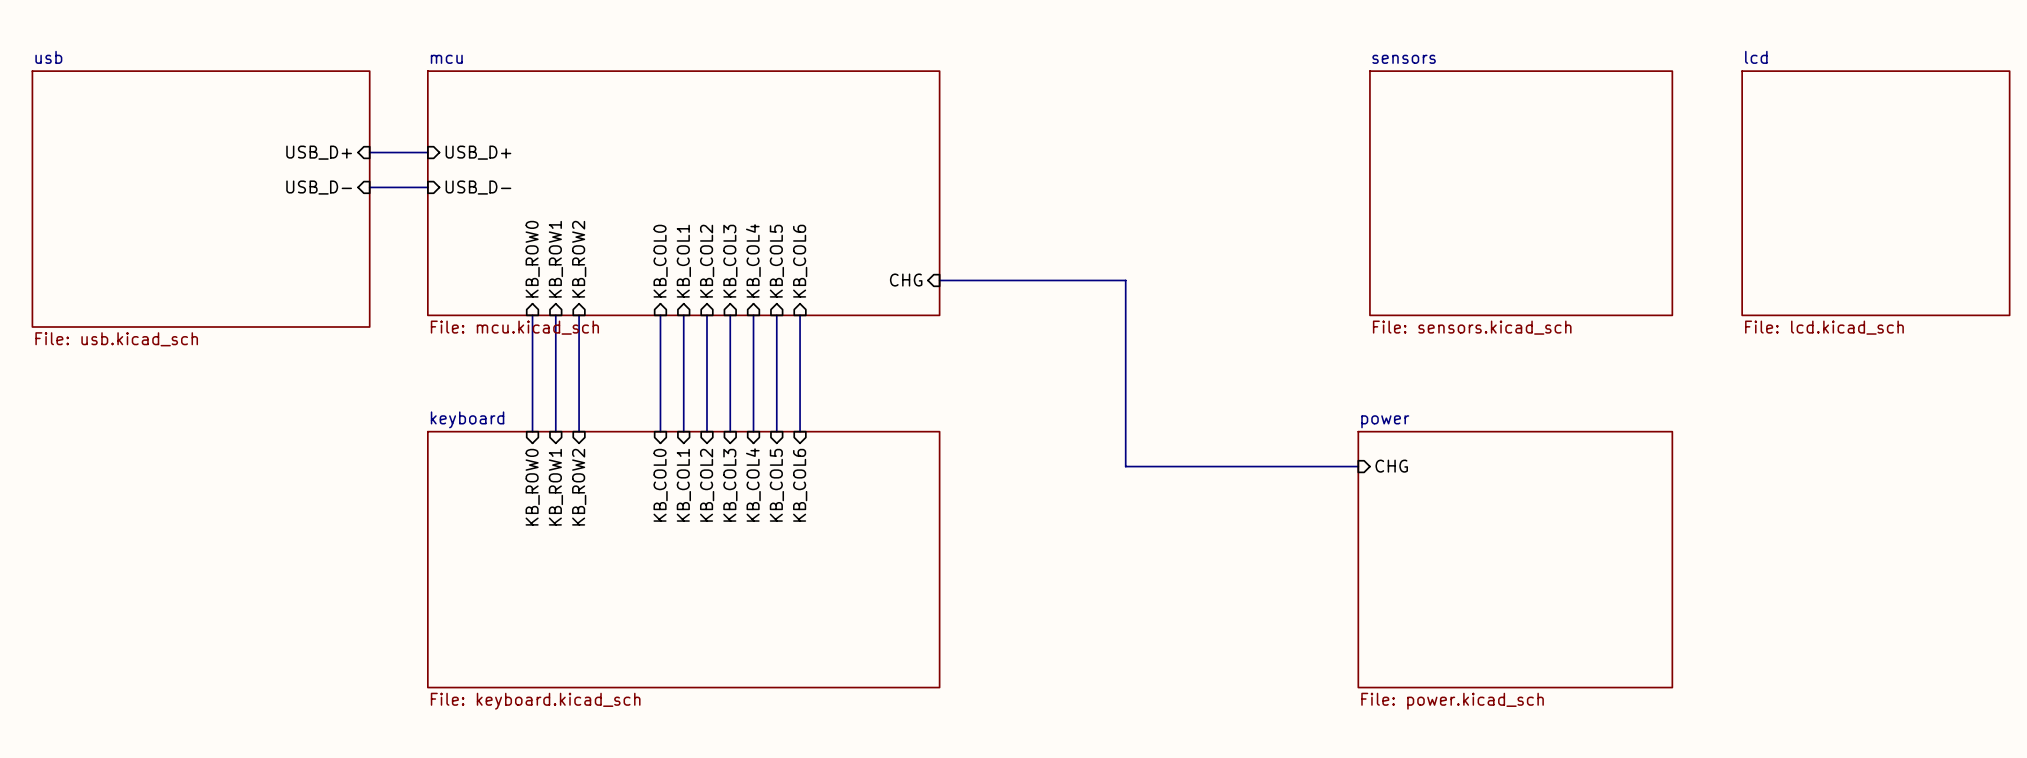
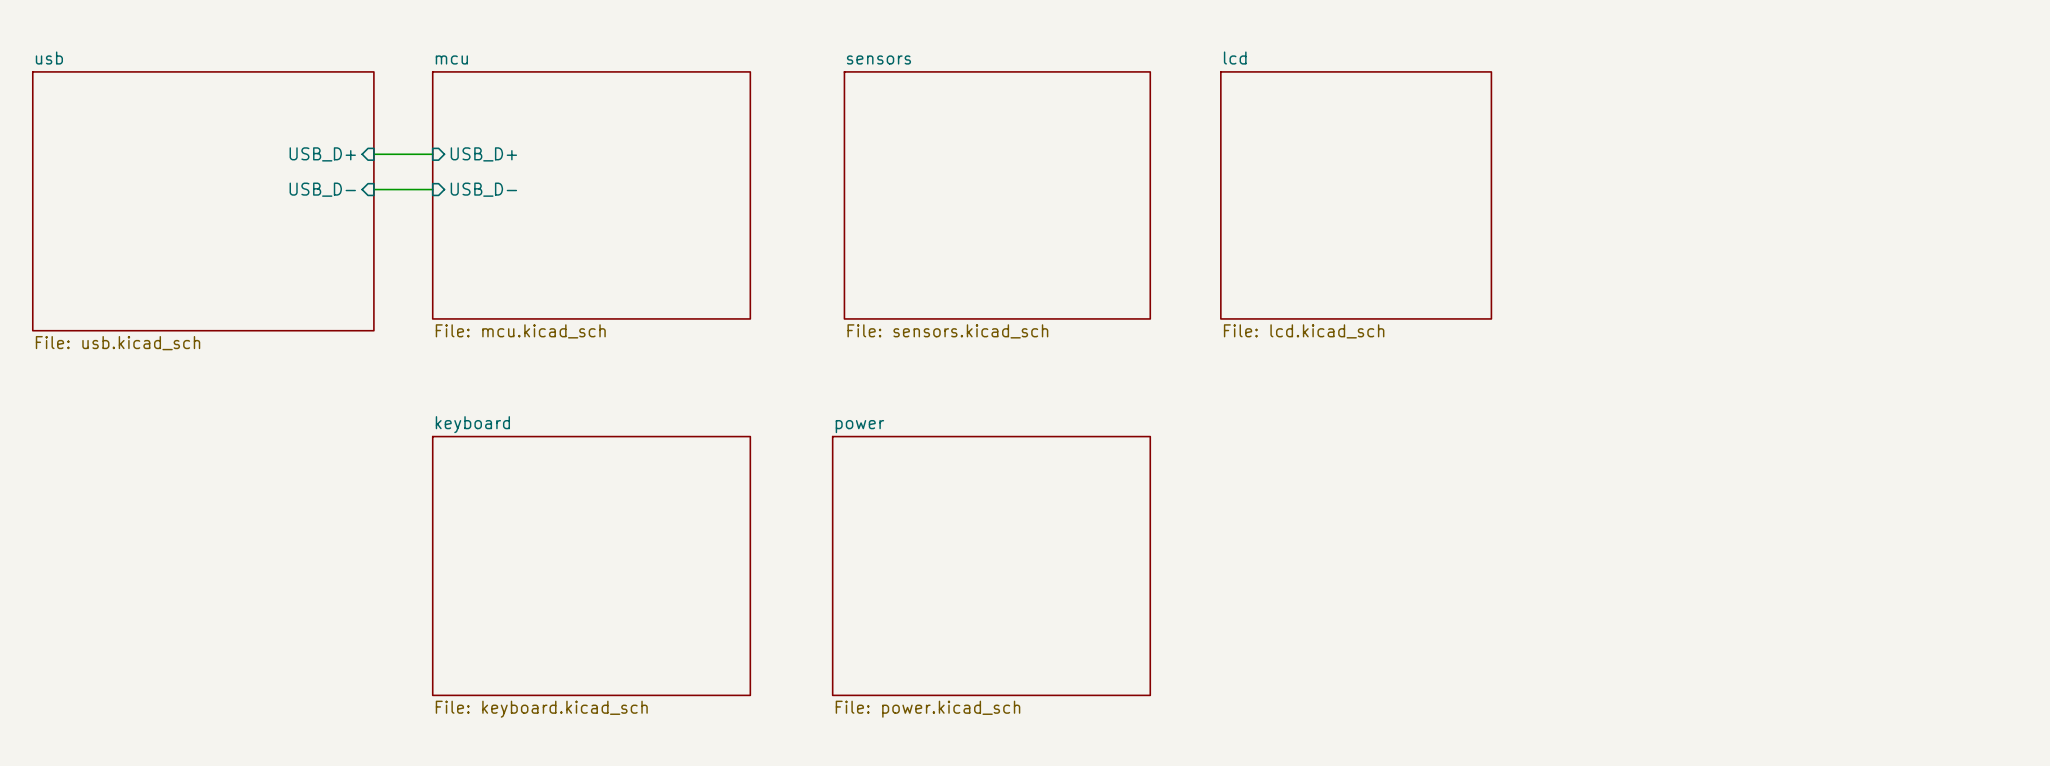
sheet mcu: none -> File: mcu.kicad_sch (591, 195)
sheet mcu: File: mcu.kicad_sch (683, 193) -> none
sheet sensors: none -> File: sensors.kicad_sch (997, 195)
sheet lcd: none -> File: lcd.kicad_sch (1356, 195)
sheet sensors: File: sensors.kicad_sch (1521, 193) -> none
sheet lcd: File: lcd.kicad_sch (1875, 193) -> none
sheet pin: KB_ROW0 (532, 259) -> none
sheet pin: KB_ROW1 (555, 259) -> none
sheet pin: KB_ROW2 (579, 259) -> none
sheet pin: KB_COL4 (753, 260) -> none
sheet pin: KB_COL0 (660, 261) -> none
sheet pin: KB_COL1 (683, 261) -> none
sheet pin: KB_COL2 (707, 261) -> none
sheet pin: KB_COL3 (730, 261) -> none
sheet pin: KB_COL5 (776, 261) -> none
sheet pin: KB_COL6 (800, 261) -> none
sheet pin: CHG (906, 280) -> none
wire: (939, 280) (1125, 280) (1125, 466) (1358, 466) -> none
wire: (532, 315) (532, 431) -> none
wire: (555, 315) (555, 431) -> none
wire: (579, 315) (579, 431) -> none
wire: (660, 315) (660, 431) -> none
wire: (683, 315) (683, 431) -> none
wire: (706, 315) (706, 431) -> none
wire: (730, 315) (730, 431) -> none
wire: (753, 315) (753, 431) -> none
wire: (776, 315) (776, 431) -> none
wire: (800, 315) (800, 431) -> none
sheet pin: CHG (1391, 466) -> none
sheet pin: KB_COL0 (660, 485) -> none
sheet pin: KB_COL1 (683, 485) -> none
sheet pin: KB_COL2 (707, 485) -> none
sheet pin: KB_COL3 (730, 485) -> none
sheet pin: KB_COL4 (753, 485) -> none
sheet pin: KB_COL5 (776, 485) -> none
sheet pin: KB_COL6 (800, 485) -> none
sheet pin: KB_ROW0 (532, 487) -> none
sheet pin: KB_ROW1 (555, 487) -> none
sheet pin: KB_ROW2 (579, 487) -> none
sheet keyboard: none -> File: keyboard.kicad_sch (591, 565)
sheet keyboard: File: keyboard.kicad_sch (683, 559) -> none
sheet power: none -> File: power.kicad_sch (991, 565)
sheet power: File: power.kicad_sch (1515, 559) -> none

